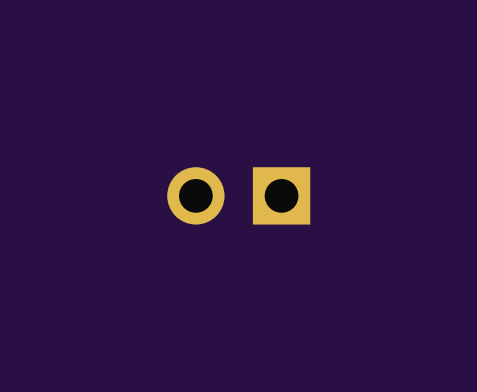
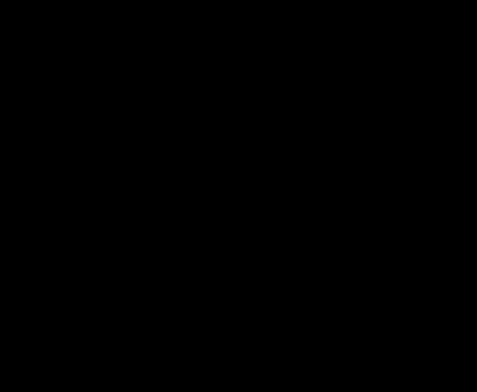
part: (238, 195) -> none

